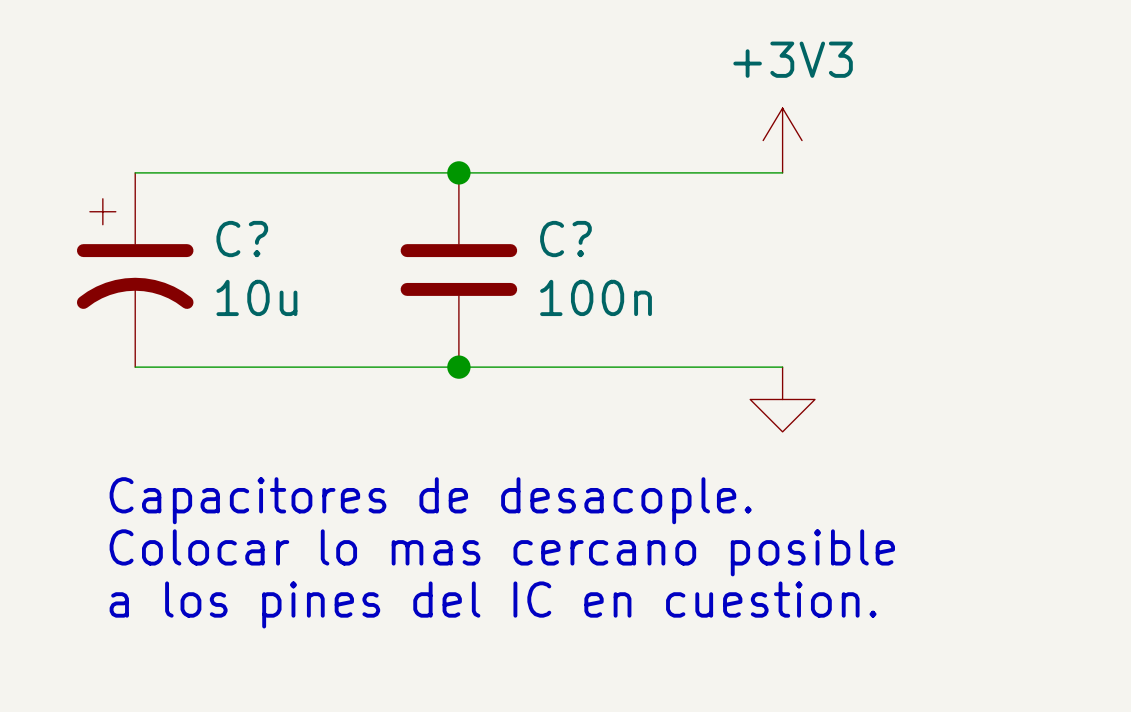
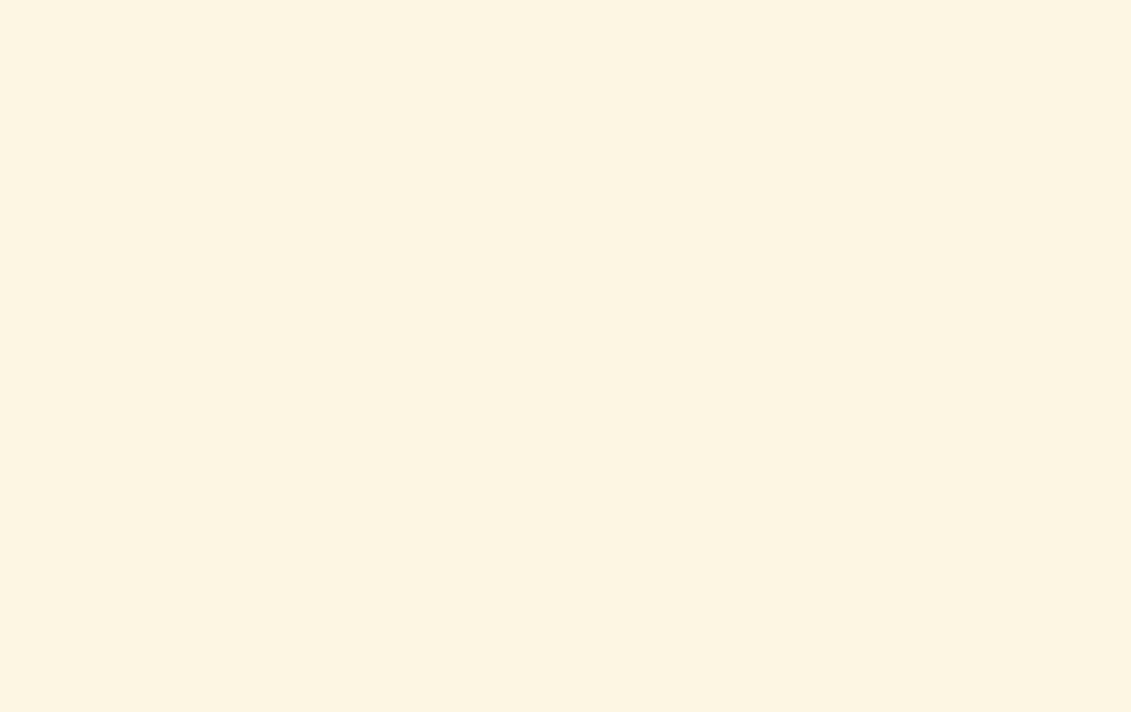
power symbol: +3V3 (782, 140) -> none
wire: (135, 172) (782, 172) -> none
junction: (458, 172) -> none
C?: 10u (135, 270) -> none
C?: 100n (458, 270) -> none
wire: (135, 367) (782, 367) -> none
junction: (458, 367) -> none
power symbol: (782, 399) -> none
text: Capacitores de desacople. (430, 500) -> none
text: Colocar lo mas cercano posible (502, 552) -> none
text: a los pines del IC en cuestion. (493, 604) -> none

